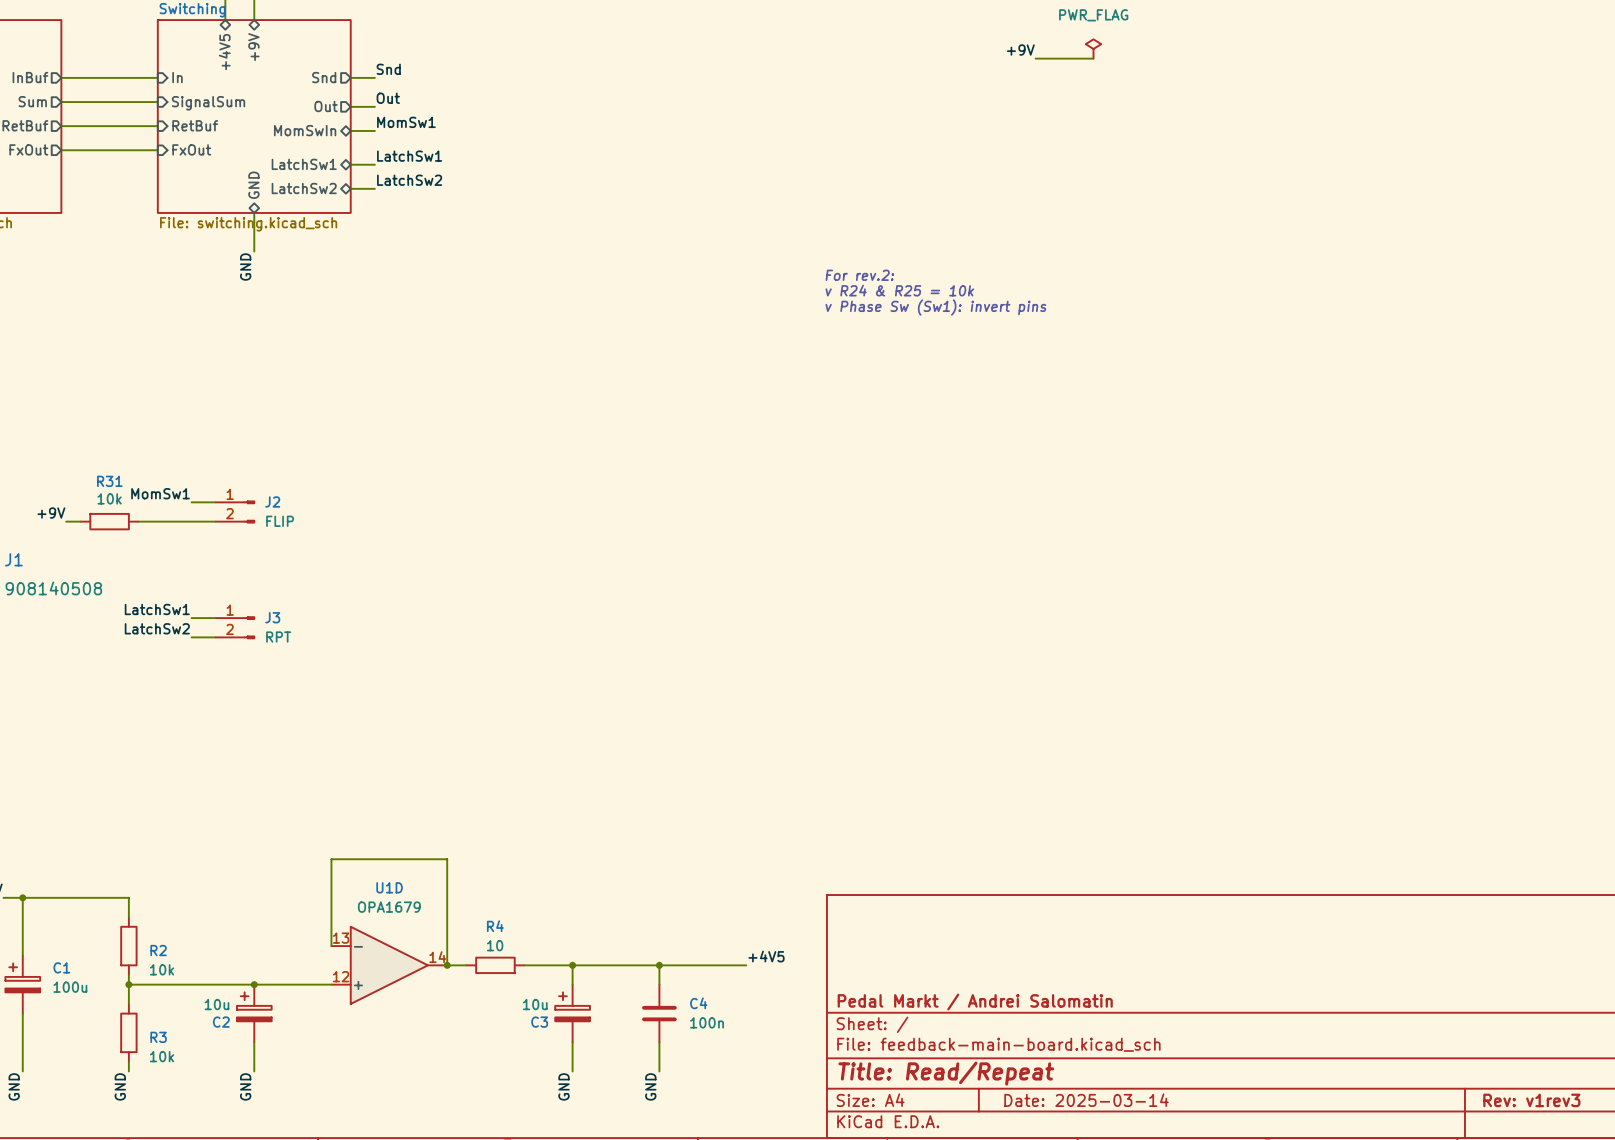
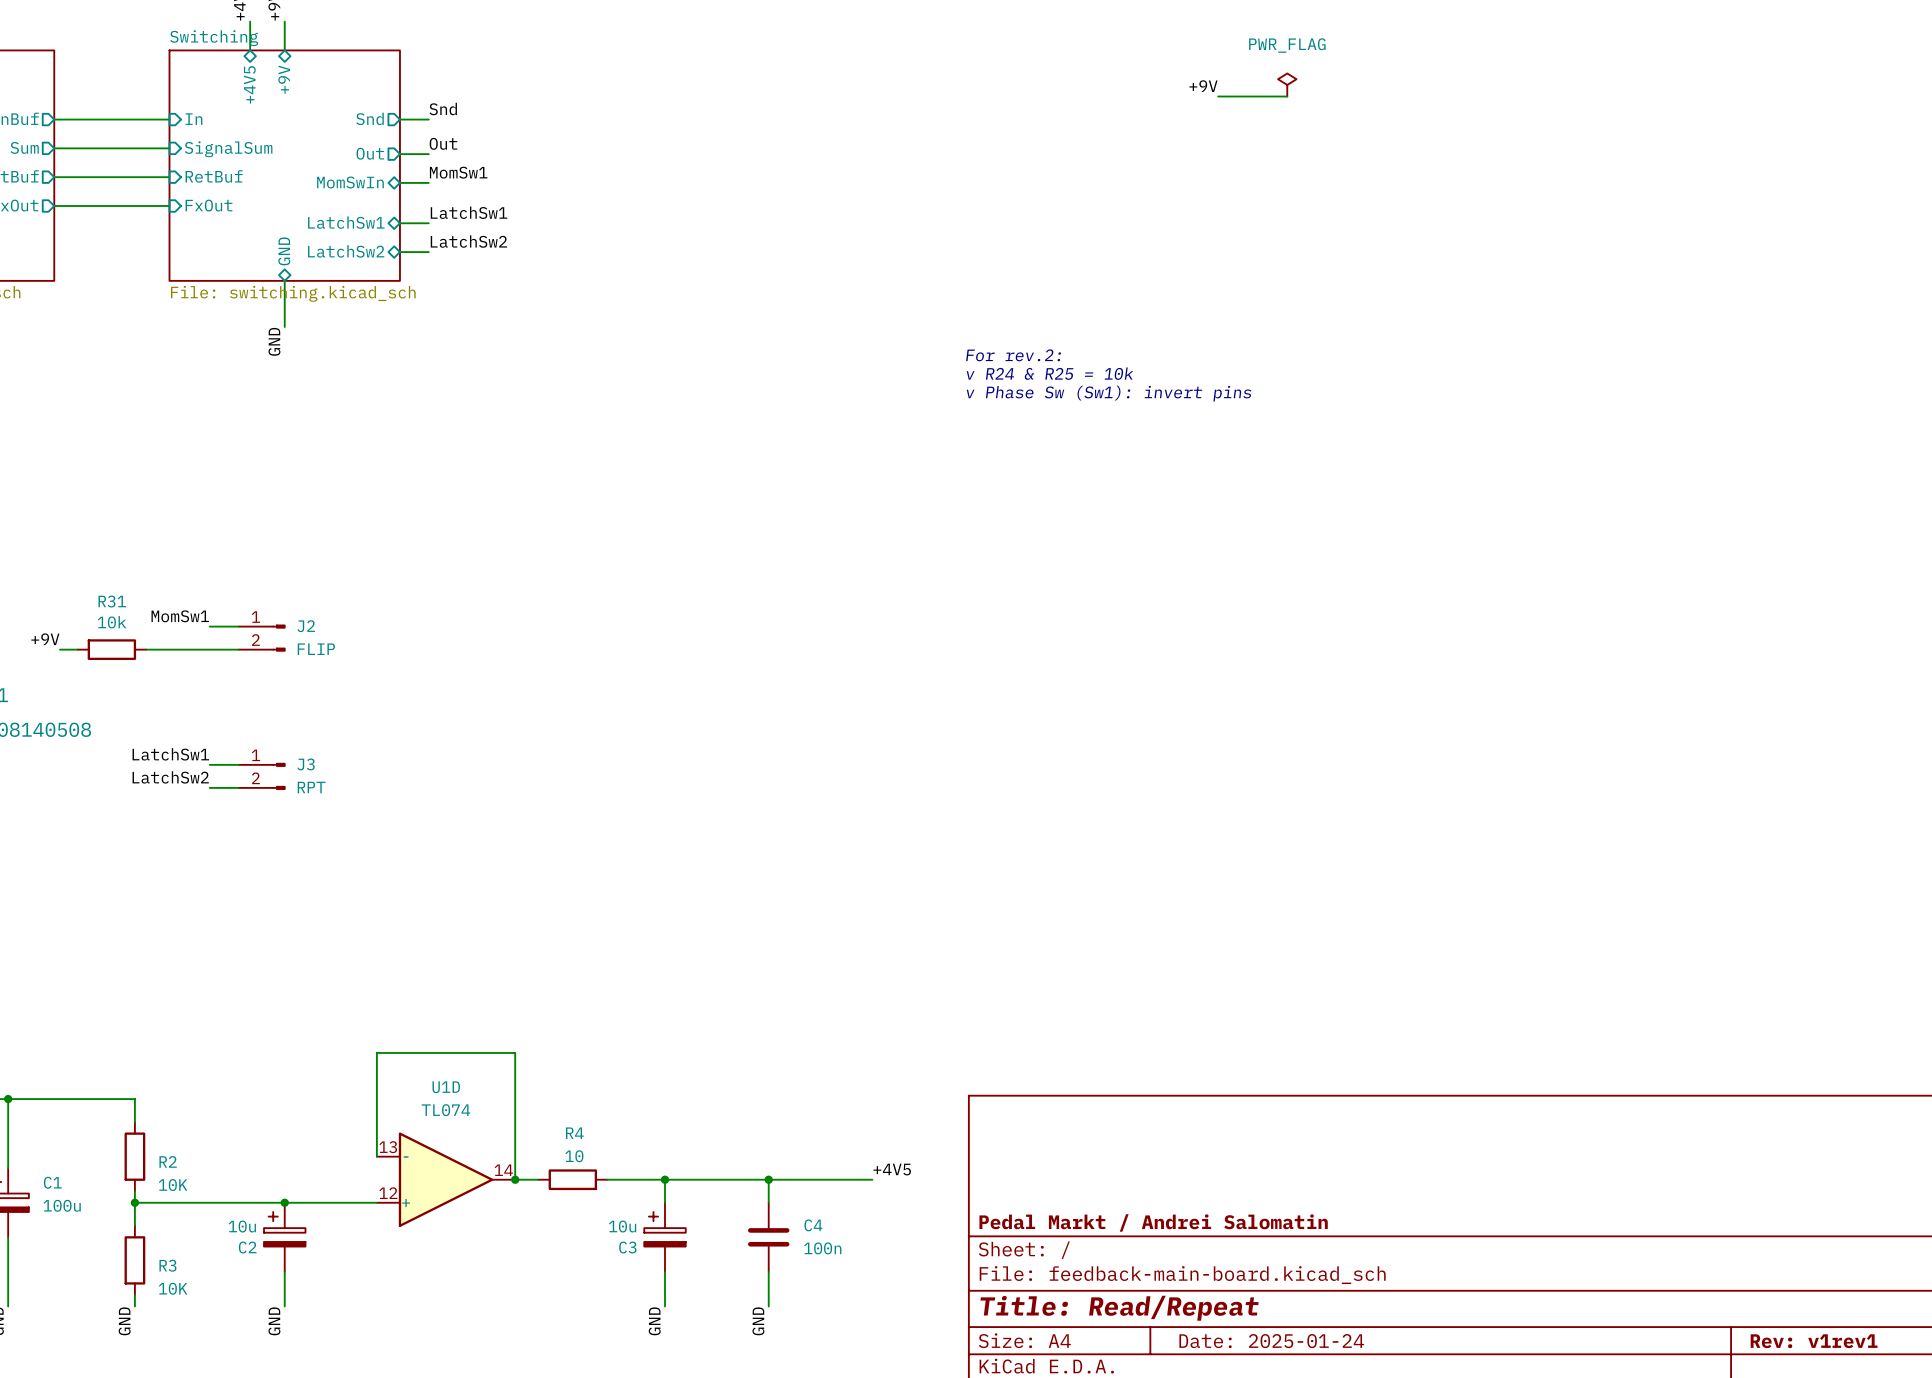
U1D value: OPA1679 (389, 907) -> TL074 (445, 1110)
R2 value: 10k (162, 969) -> 10K (173, 1185)
R3 value: 10k (162, 1056) -> 10K (173, 1288)
title block: Date: 2025-03-14 (1086, 1100) -> Date: 2025-01-24 (1271, 1341)
title block: Rev: v1rev3 (1531, 1100) -> Rev: v1rev1 (1814, 1341)

